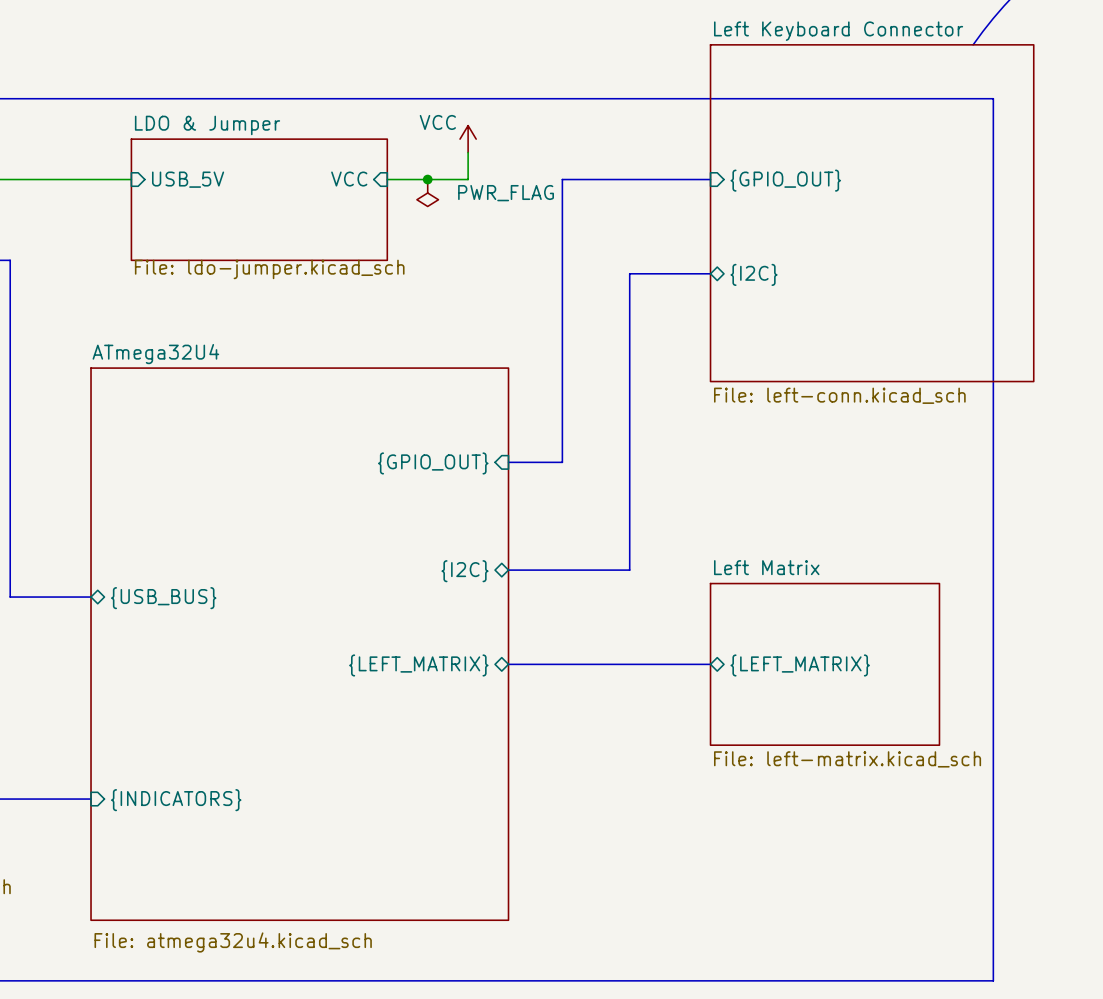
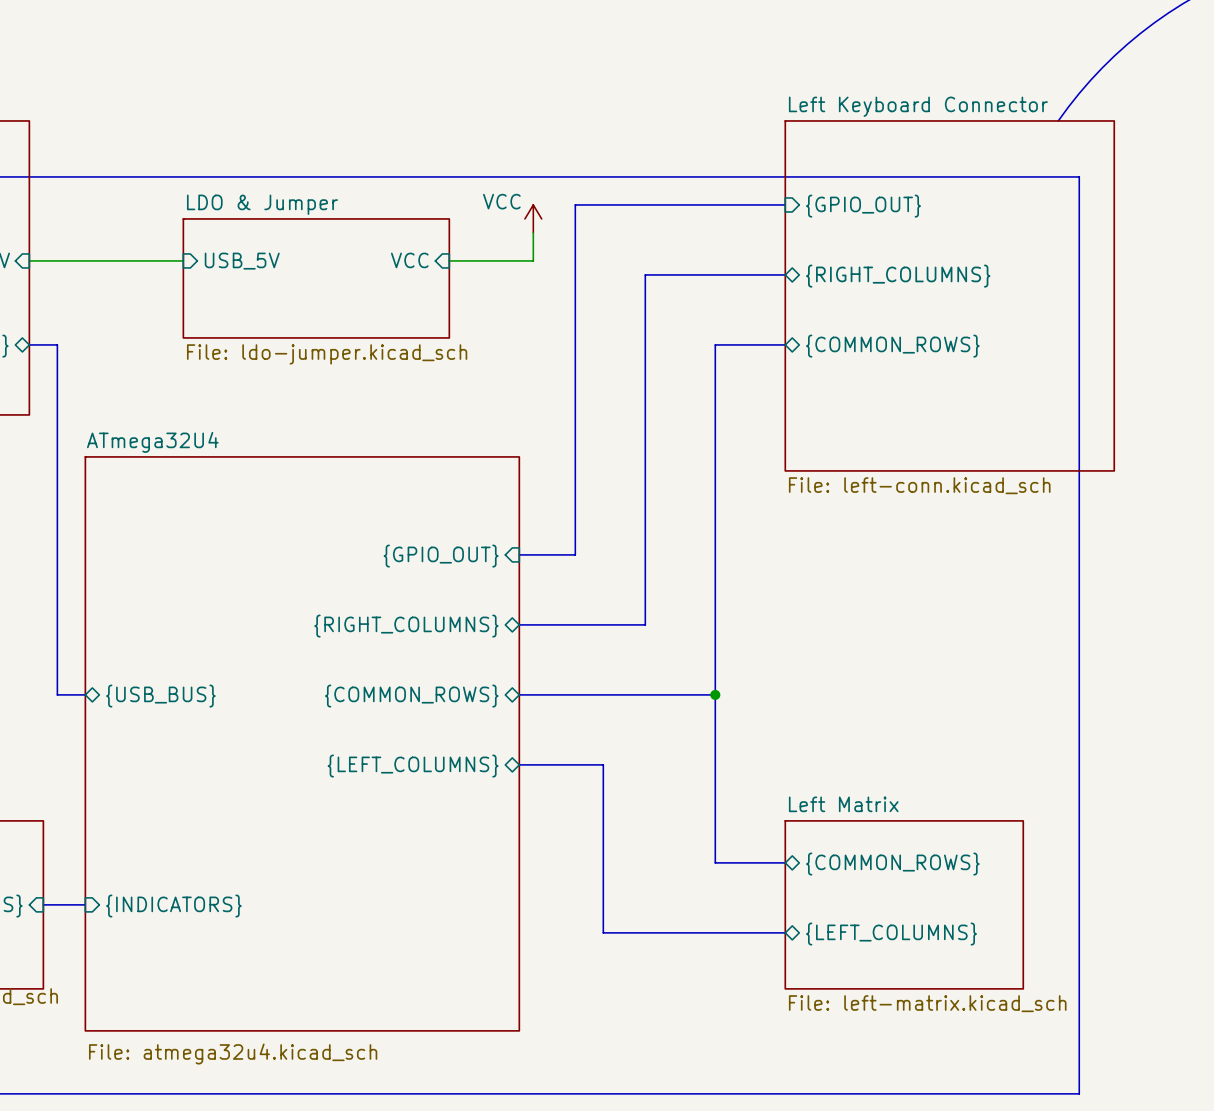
sheet Left Keyboard Connector shape: [709, 44, 1035, 383] -> [784, 120, 1116, 472]
bus: none -> (785, 204) (575, 204) (575, 554) (519, 554)
sheet LDO & Jumper shape: [130, 138, 389, 262] -> [182, 218, 451, 339]
junction: (427, 179) -> none
bus: (710, 179) (562, 179) (562, 462) (508, 462) -> none
sheet pin position: {GPIO_OUT} (785, 180) -> {GPIO_OUT} (863, 206)
power symbol: PWR_FLAG (427, 193) -> none
bus: none -> (785, 274) (645, 274) (645, 624) (519, 624)
sheet pin: none -> {RIGHT_COLUMNS} (898, 276)
bus: none -> (785, 344) (715, 344) (715, 862) (785, 862)
sheet pin: none -> {COMMON_ROWS} (892, 346)
bus: (710, 273) (629, 273) (629, 570) (508, 570) -> none
sheet pin: {I2C} (754, 274) -> none
sheet pin position: {GPIO_OUT} (433, 463) -> {GPIO_OUT} (441, 556)
sheet pin: none -> {RIGHT_COLUMNS} (406, 626)
sheet pin: {I2C} (465, 571) -> none
bus: (37, 597) (91, 597) -> none
bus: none -> (519, 694) (715, 694)
junction: none -> (715, 694)
sheet pin position: {USB_BUS} (163, 598) -> {USB_BUS} (160, 696)
sheet pin: none -> {COMMON_ROWS} (411, 696)
sheet ATmega32U4 position: (299, 644) -> (302, 743)
bus: none -> (519, 764) (575, 764)
bus: (535, 664) (710, 664) -> (603, 764) (603, 932) (785, 932)
sheet Left Matrix position: (825, 664) -> (904, 904)
sheet pin: none -> {LEFT_COLUMNS} (413, 766)
sheet pin: {LEFT_MATRIX} (418, 665) -> none
sheet pin: {LEFT_MATRIX} (800, 665) -> none
sheet pin: none -> {COMMON_ROWS} (892, 864)
bus: (37, 799) (91, 799) -> none
sheet pin position: {INDICATORS} (176, 800) -> {INDICATORS} (173, 906)
sheet pin: none -> {LEFT_COLUMNS} (891, 934)

